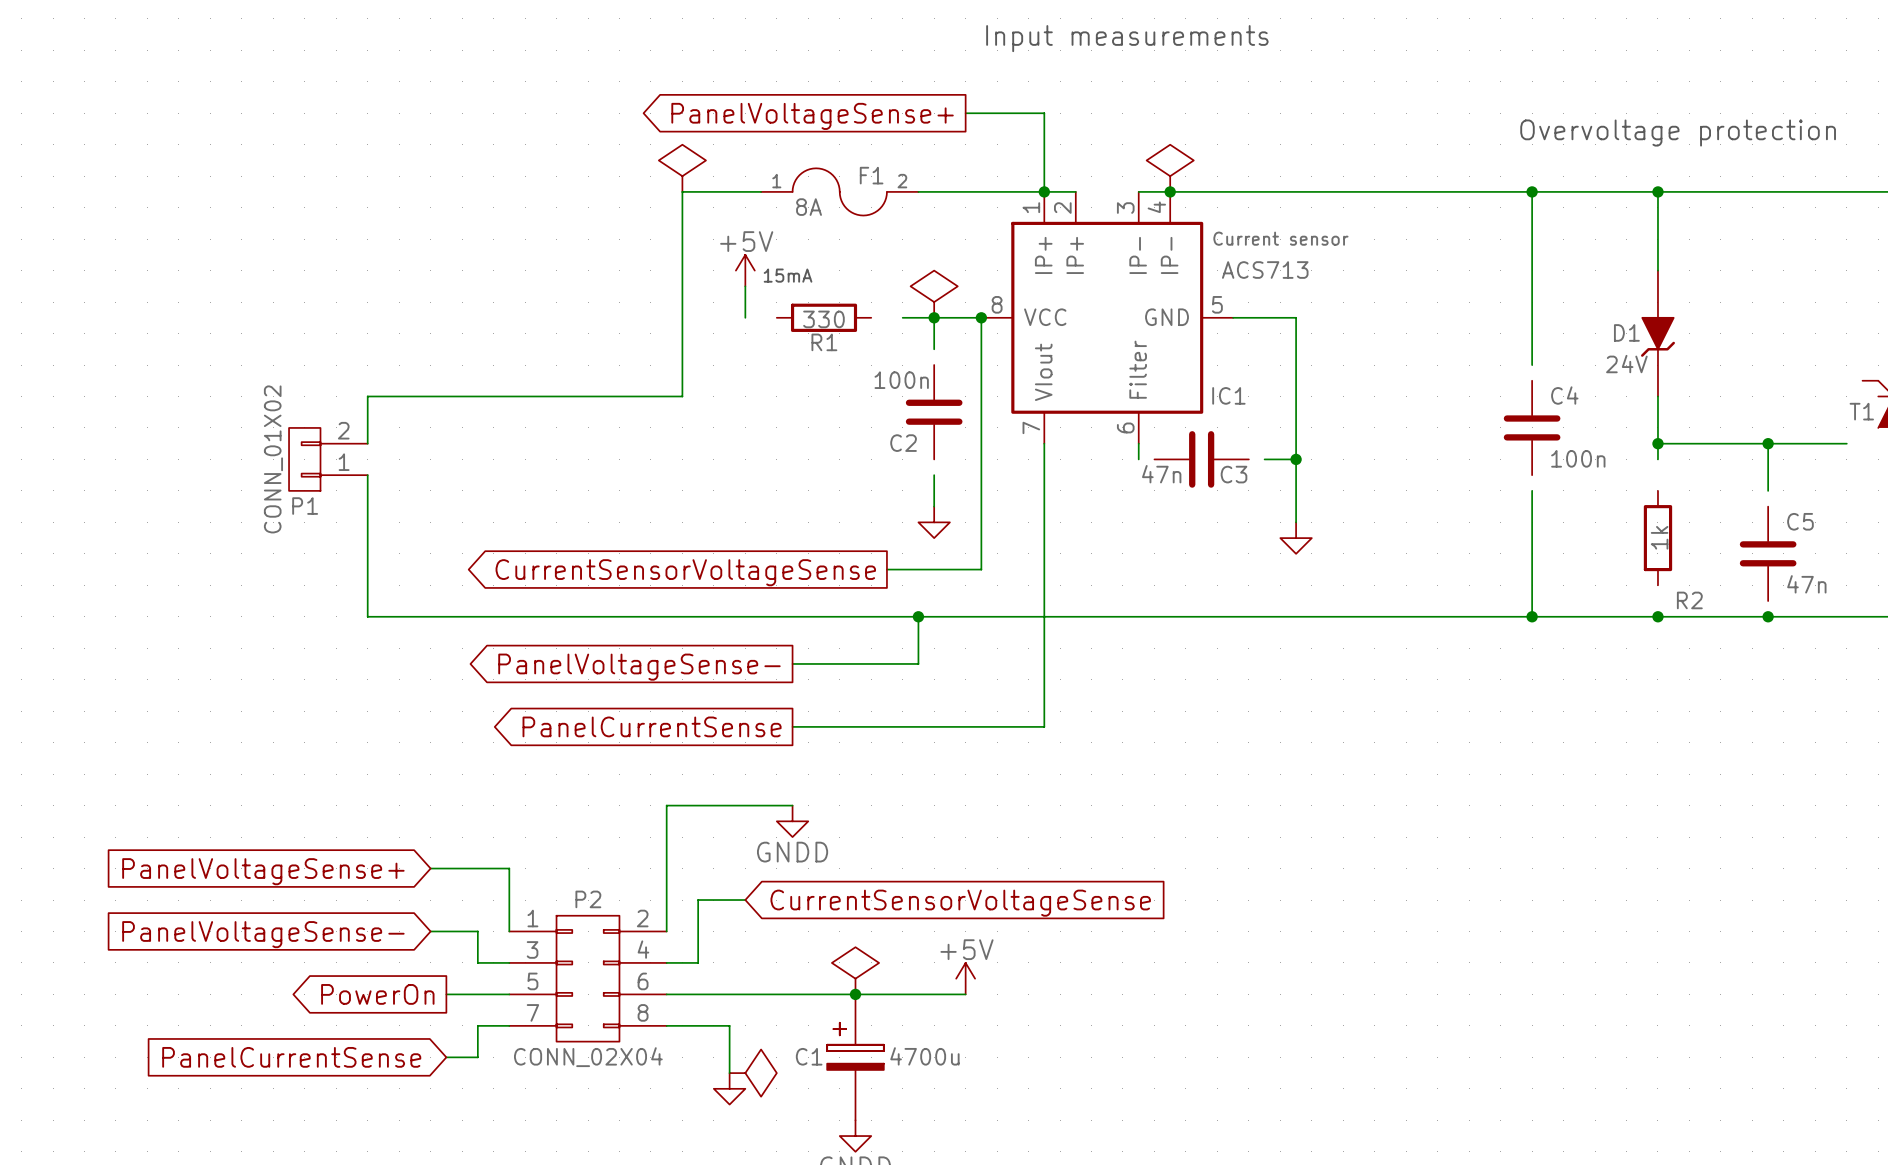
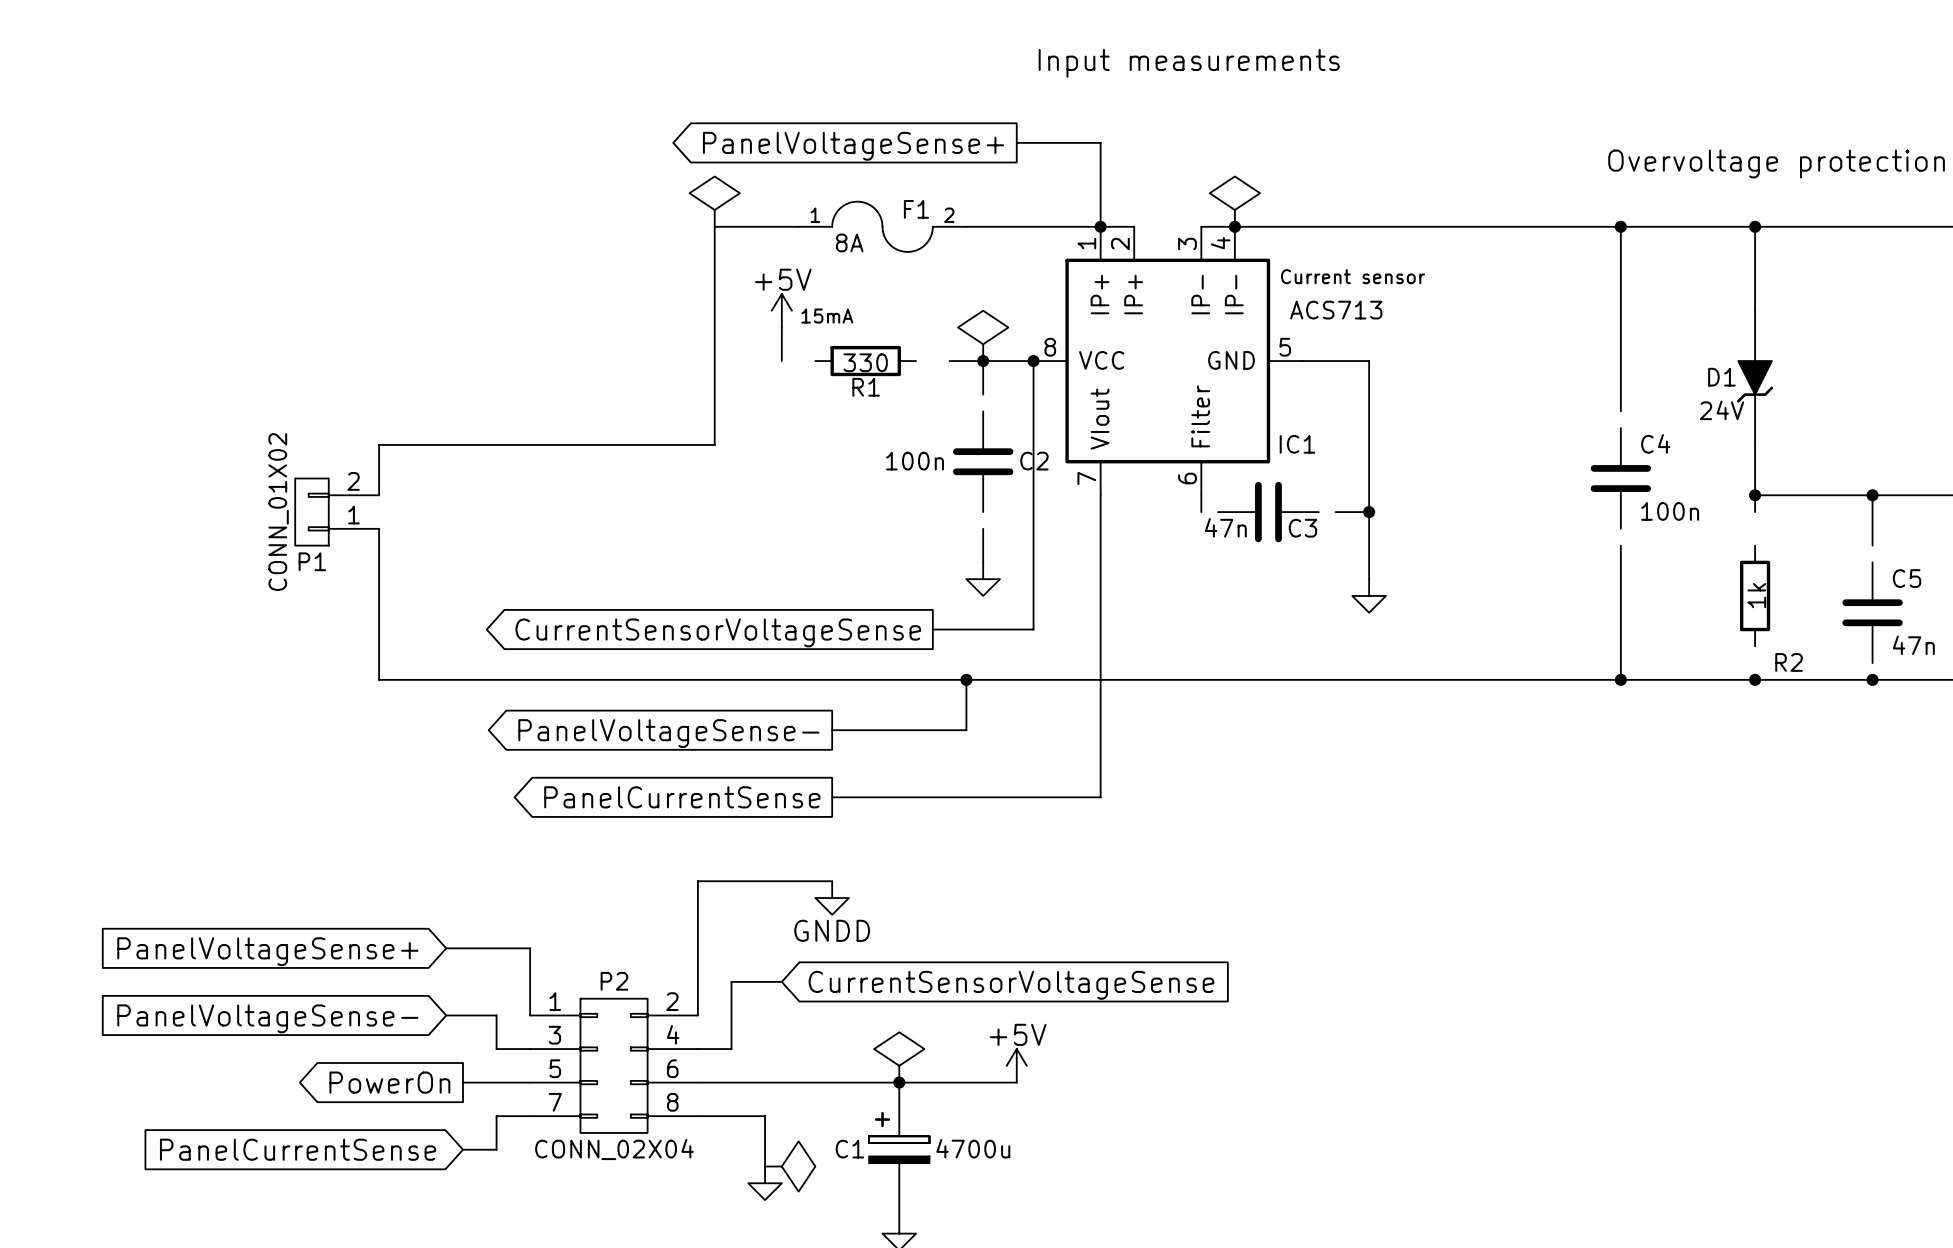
C2 value position: 100n (901, 380) -> 100n (915, 461)
C2 name position: C2 (903, 443) -> C2 (1034, 461)

